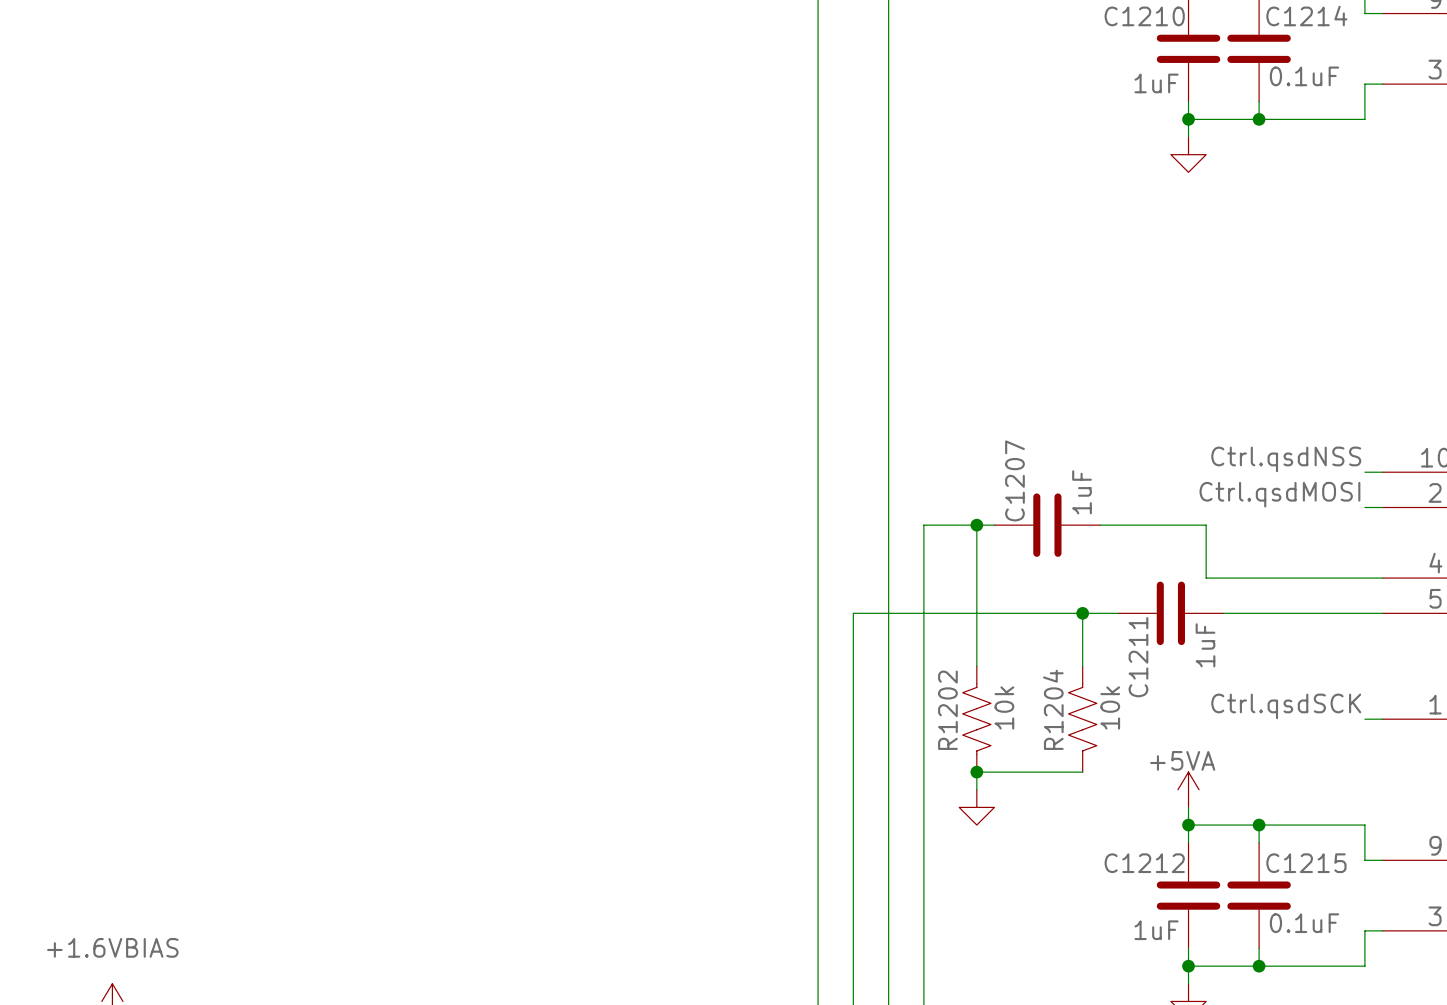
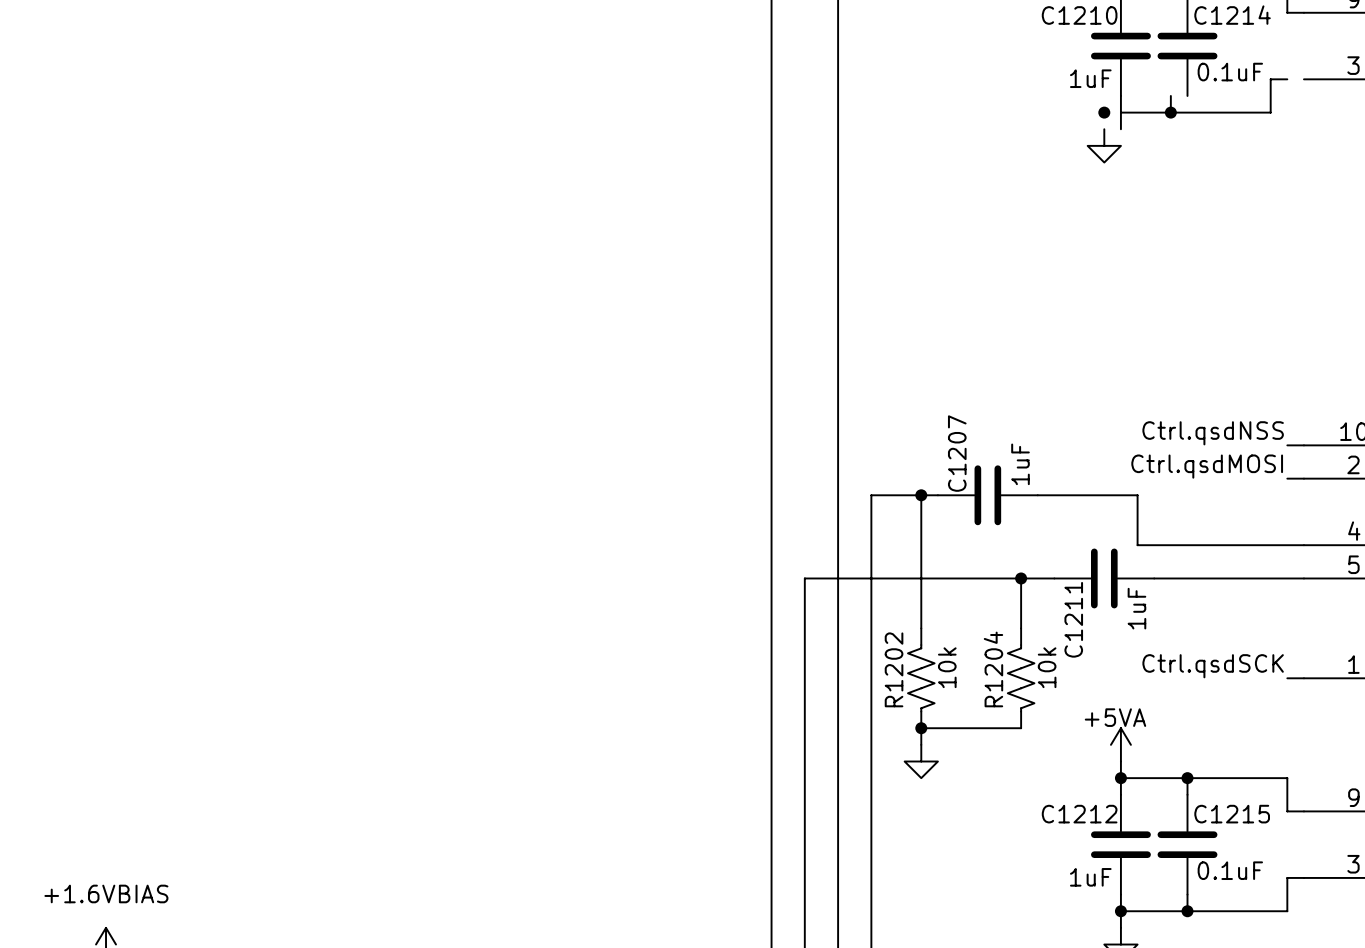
wire: (1382, 84) (1364, 84) (1364, 119) (1347, 119) -> (1287, 79) (1270, 79) (1270, 112)
wire: (1259, 101) (1259, 119) -> (1170, 95) (1170, 112)
junction position: (1188, 119) -> (1104, 112)
junction position: (1259, 119) -> (1170, 112)
power symbol position: (1188, 154) -> (1104, 145)

